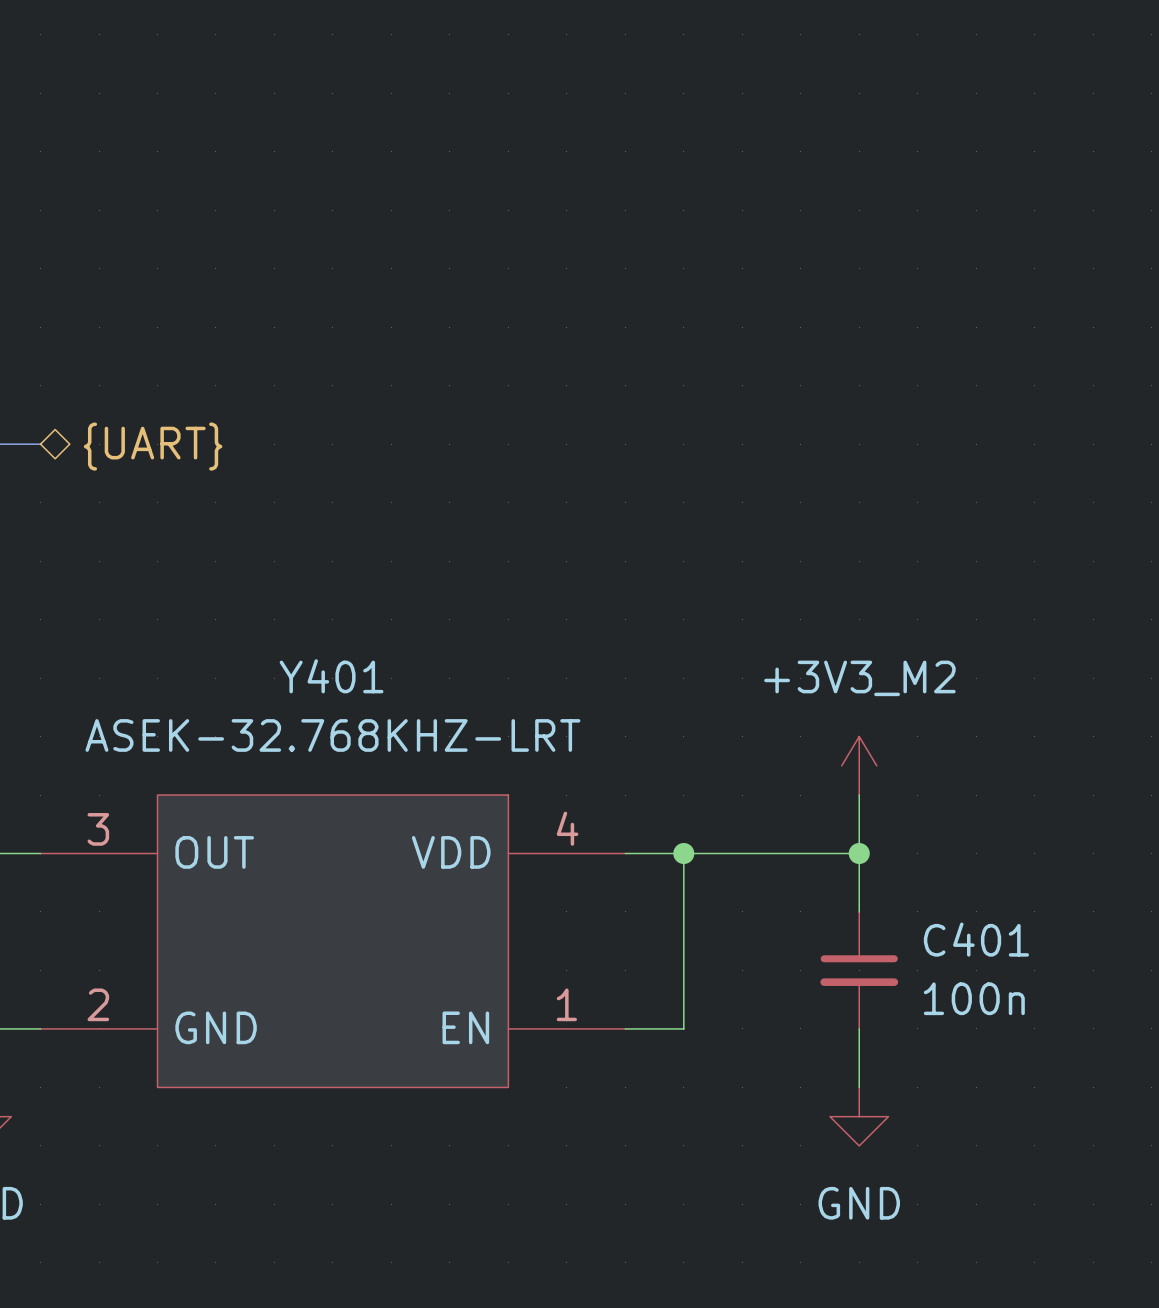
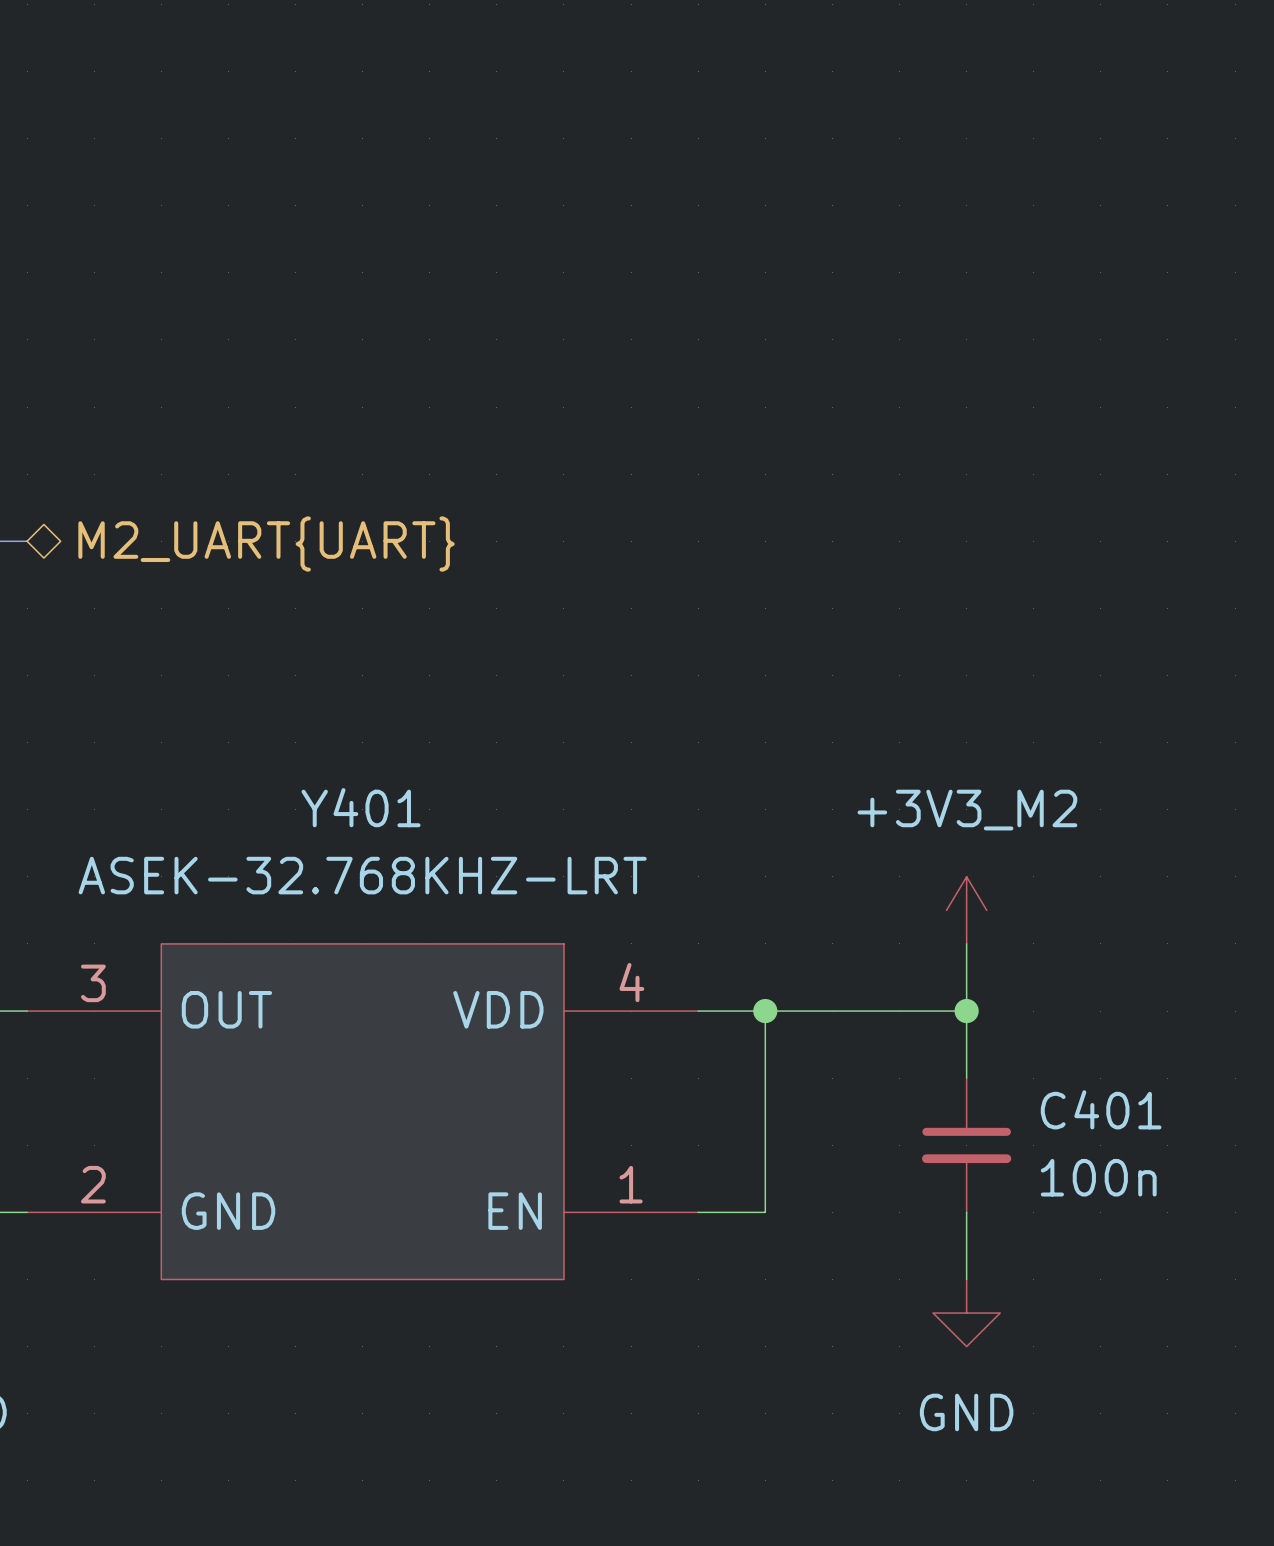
hierarchical label: {UART} (153, 446) -> M2_UART{UART} (266, 544)

